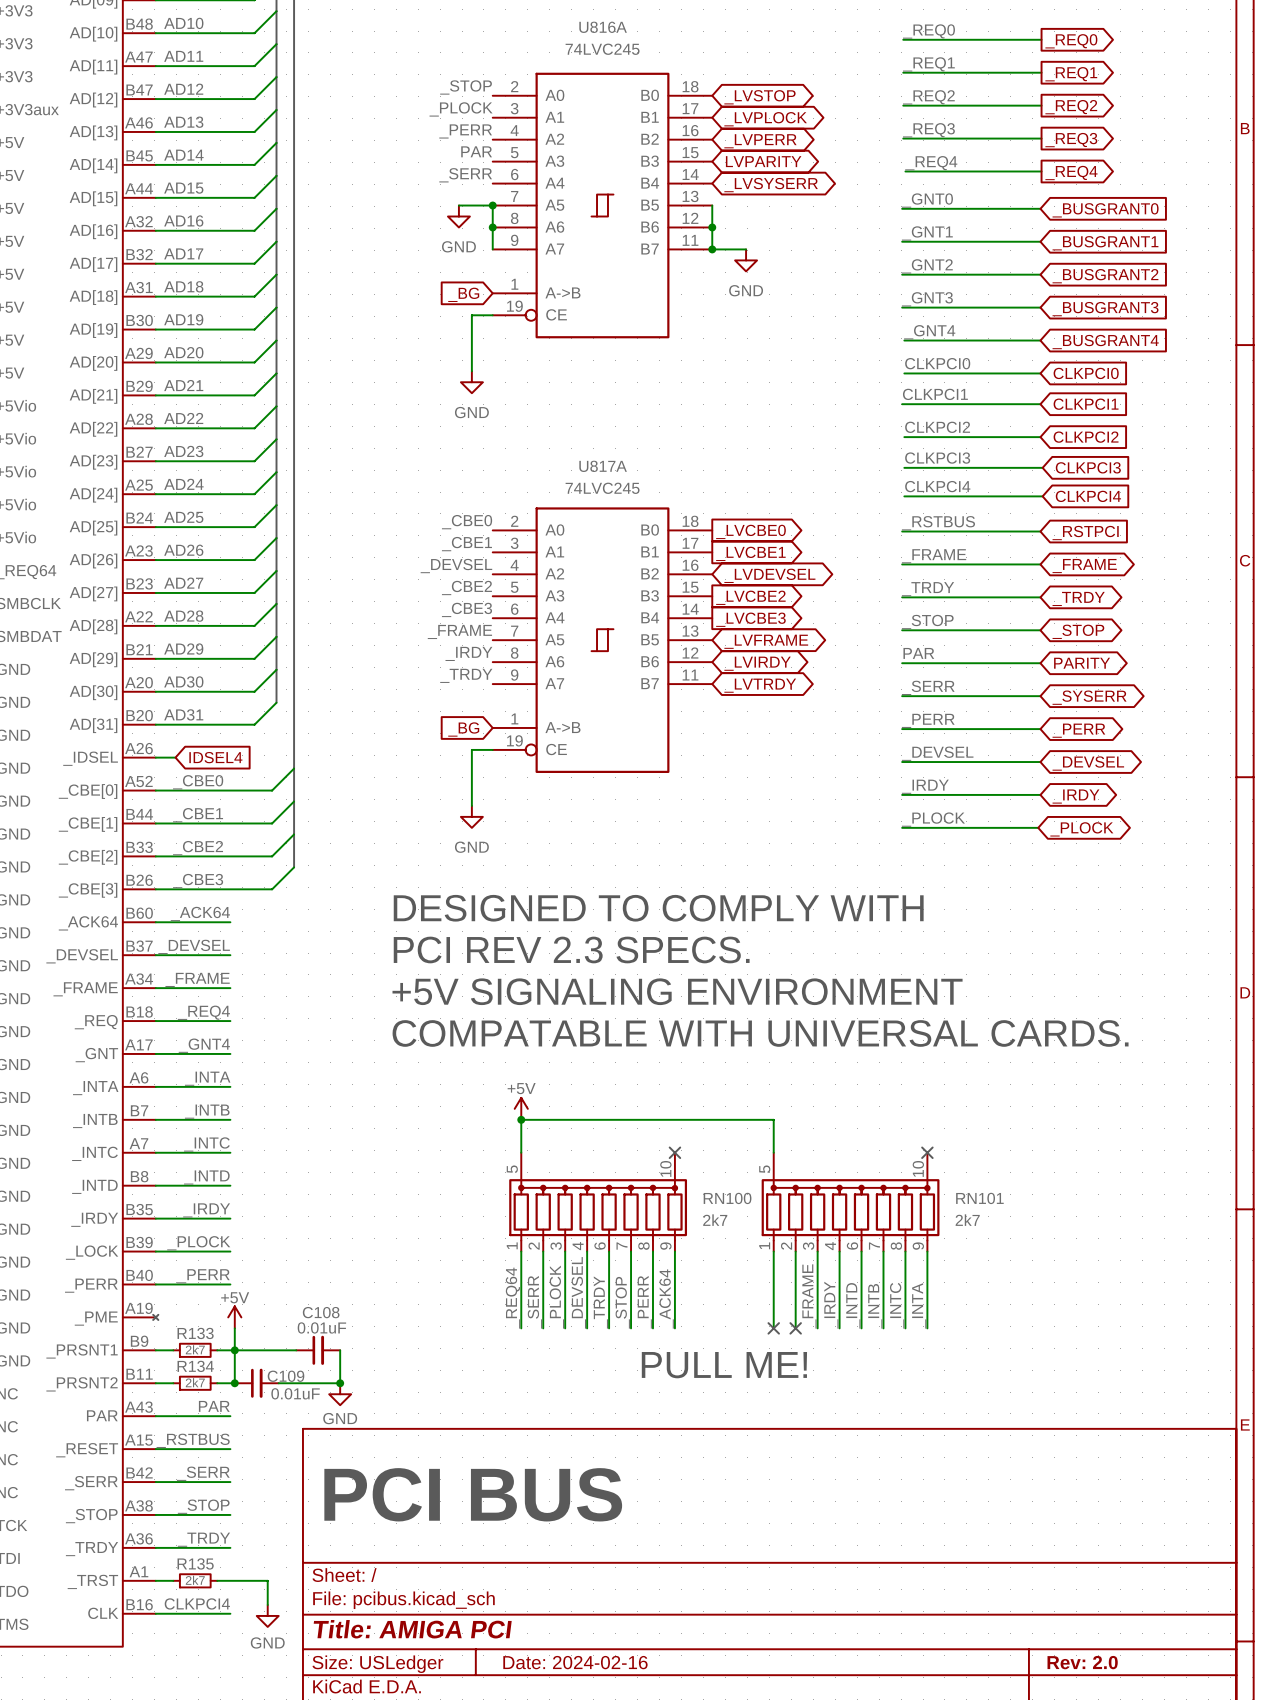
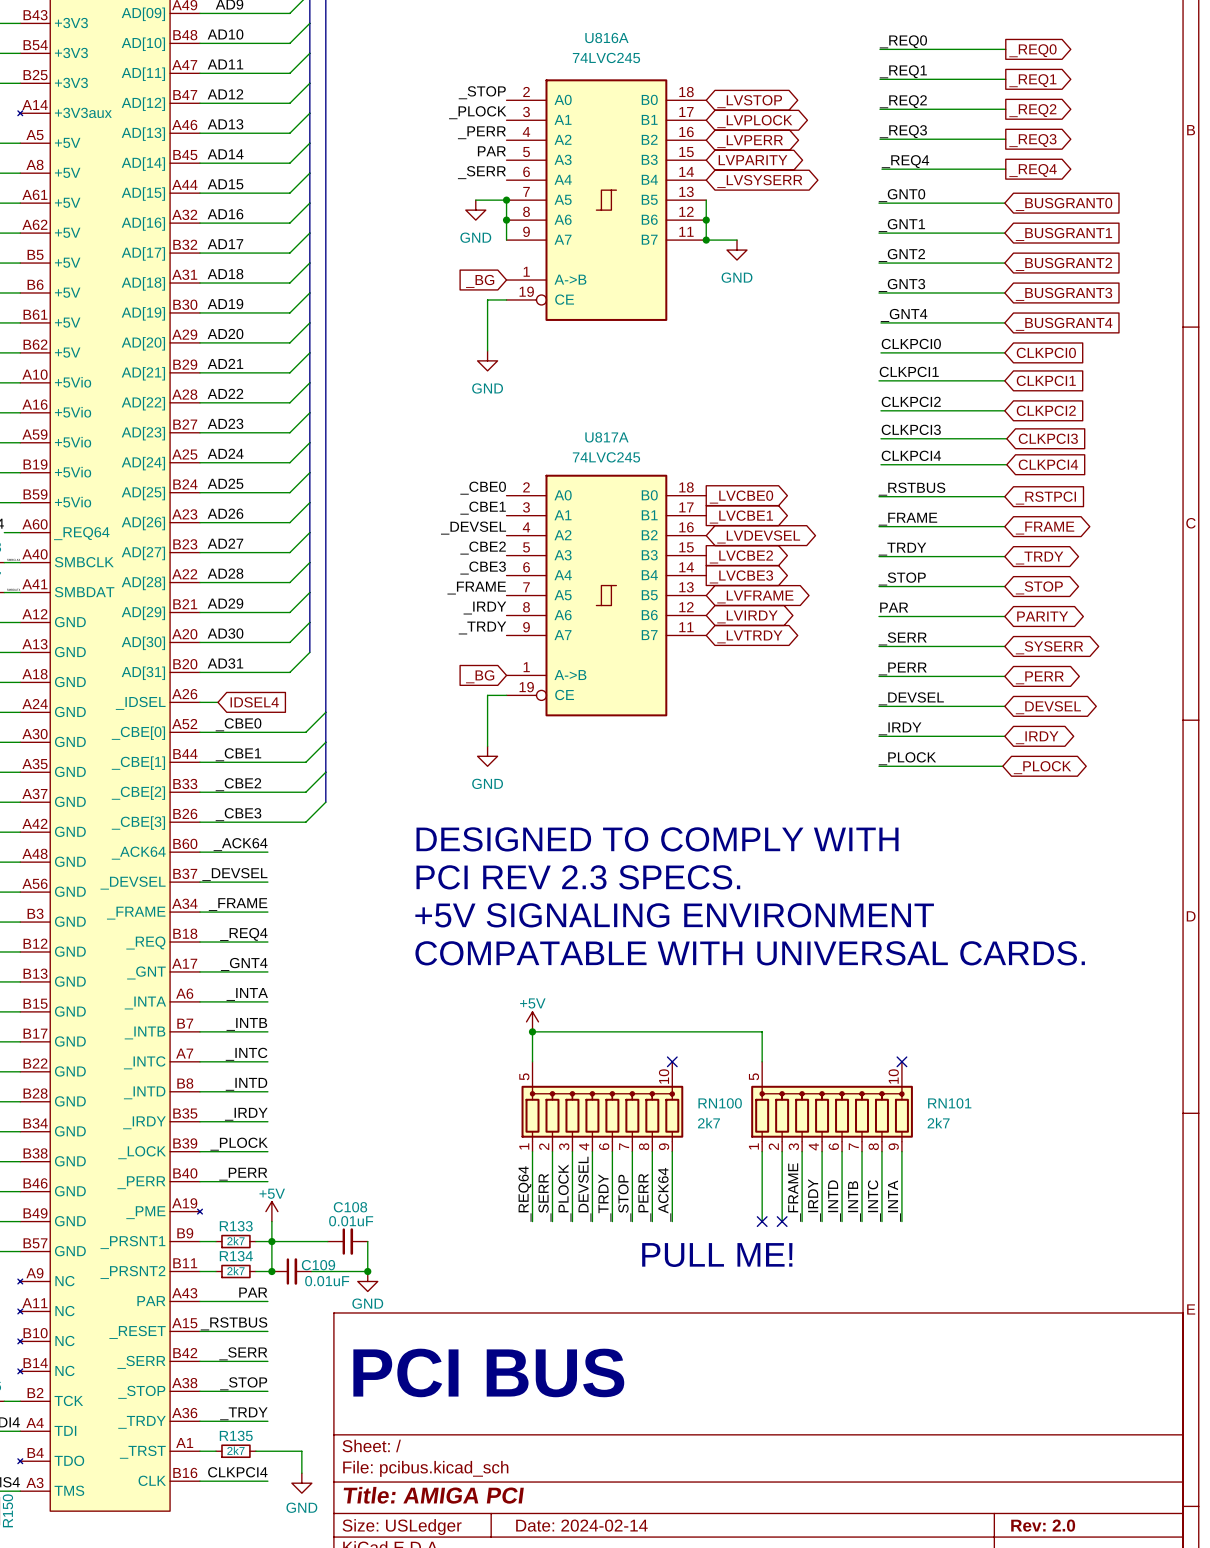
title block: Date: 2024-02-16 (575, 1662) -> Date: 2024-02-14 (581, 1525)

